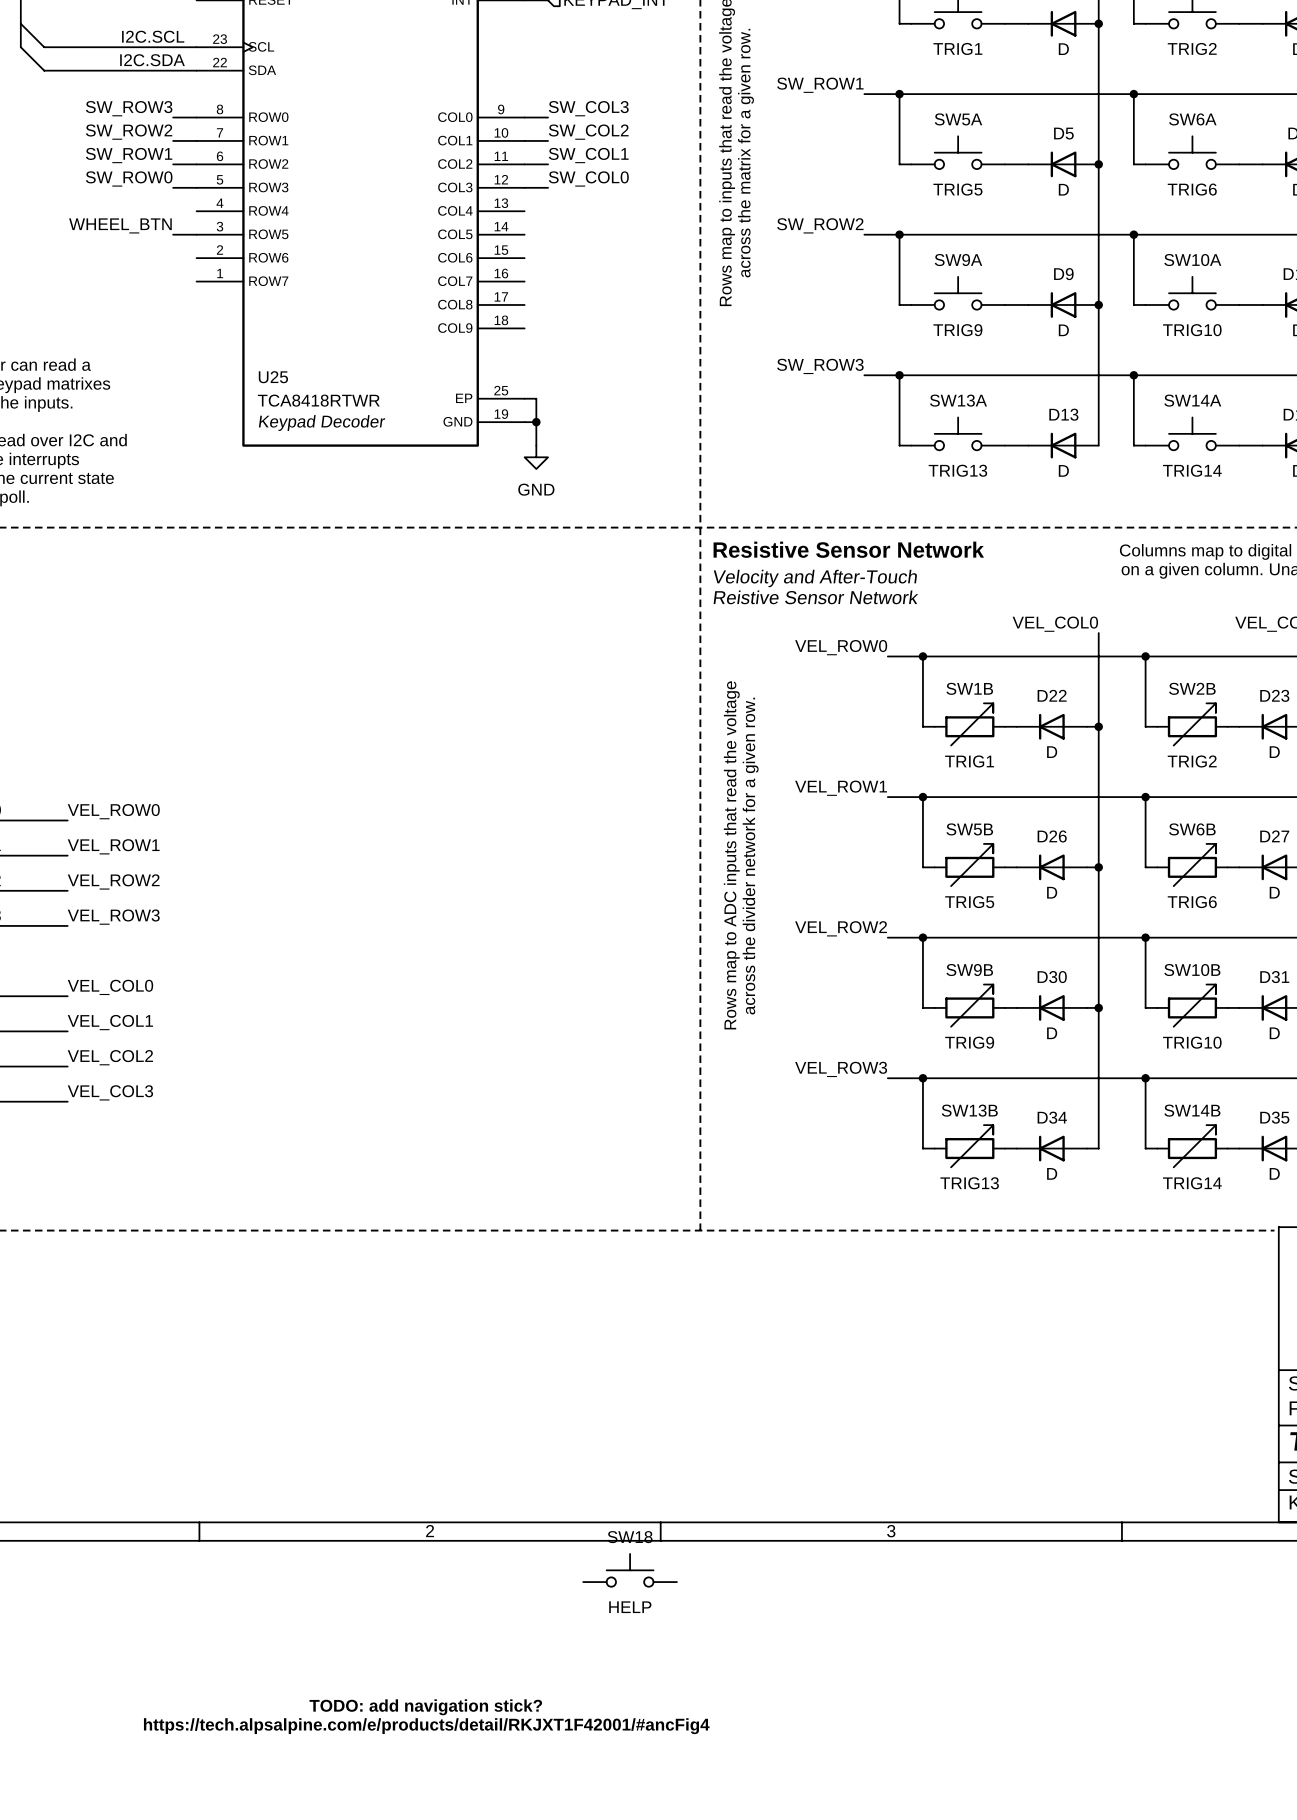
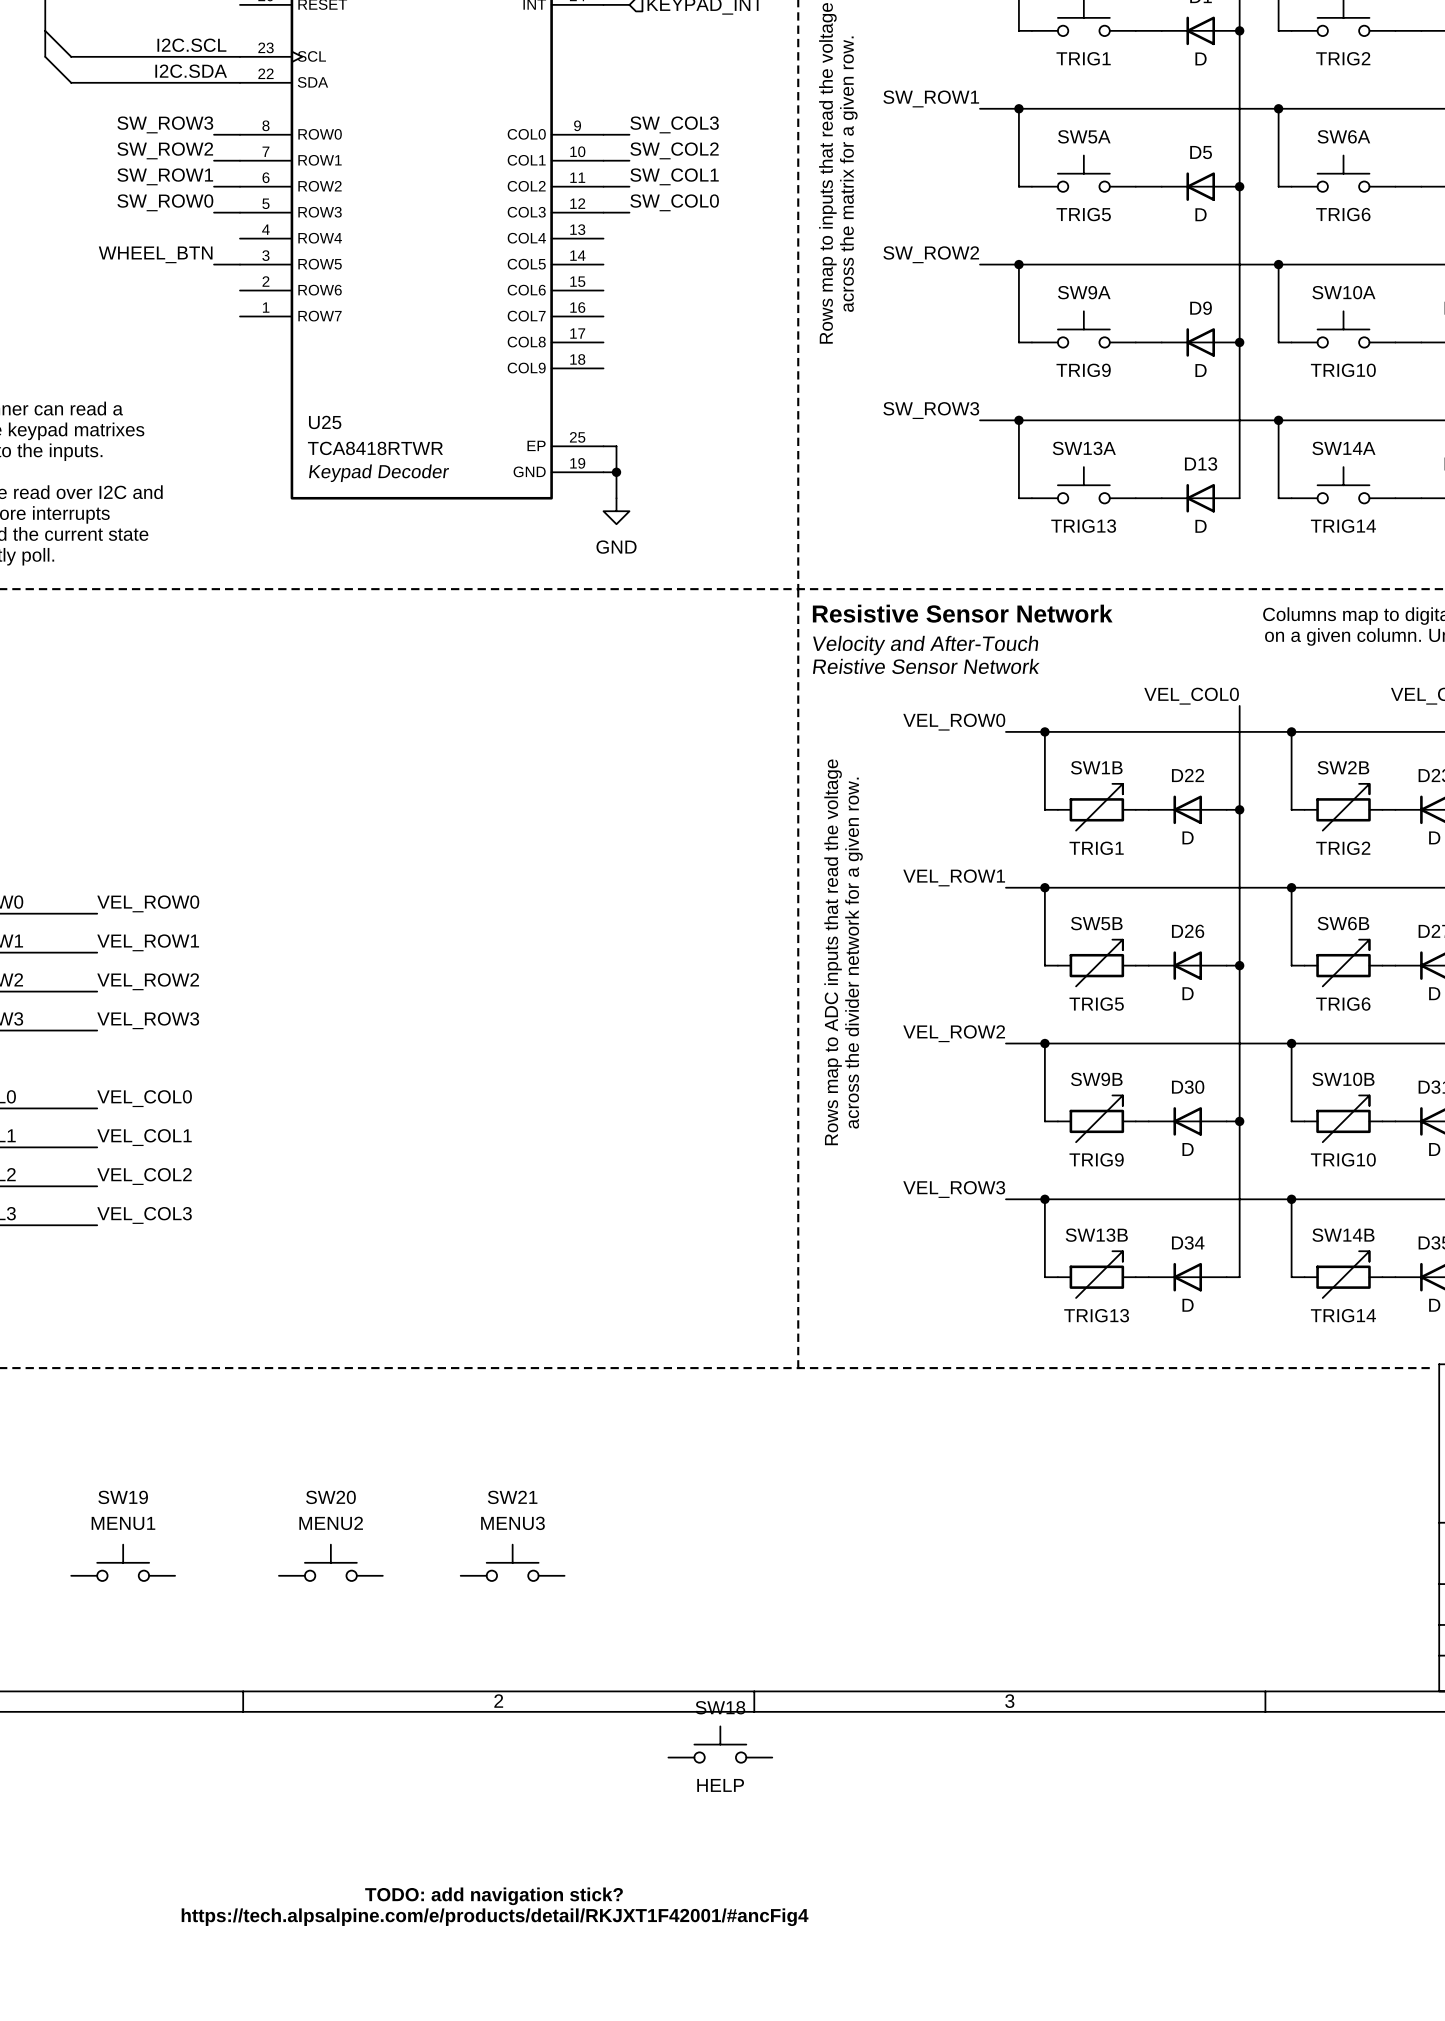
SW19: none -> MENU1 (123, 1562)
SW20: none -> MENU2 (330, 1562)
SW21: none -> MENU3 (512, 1562)

